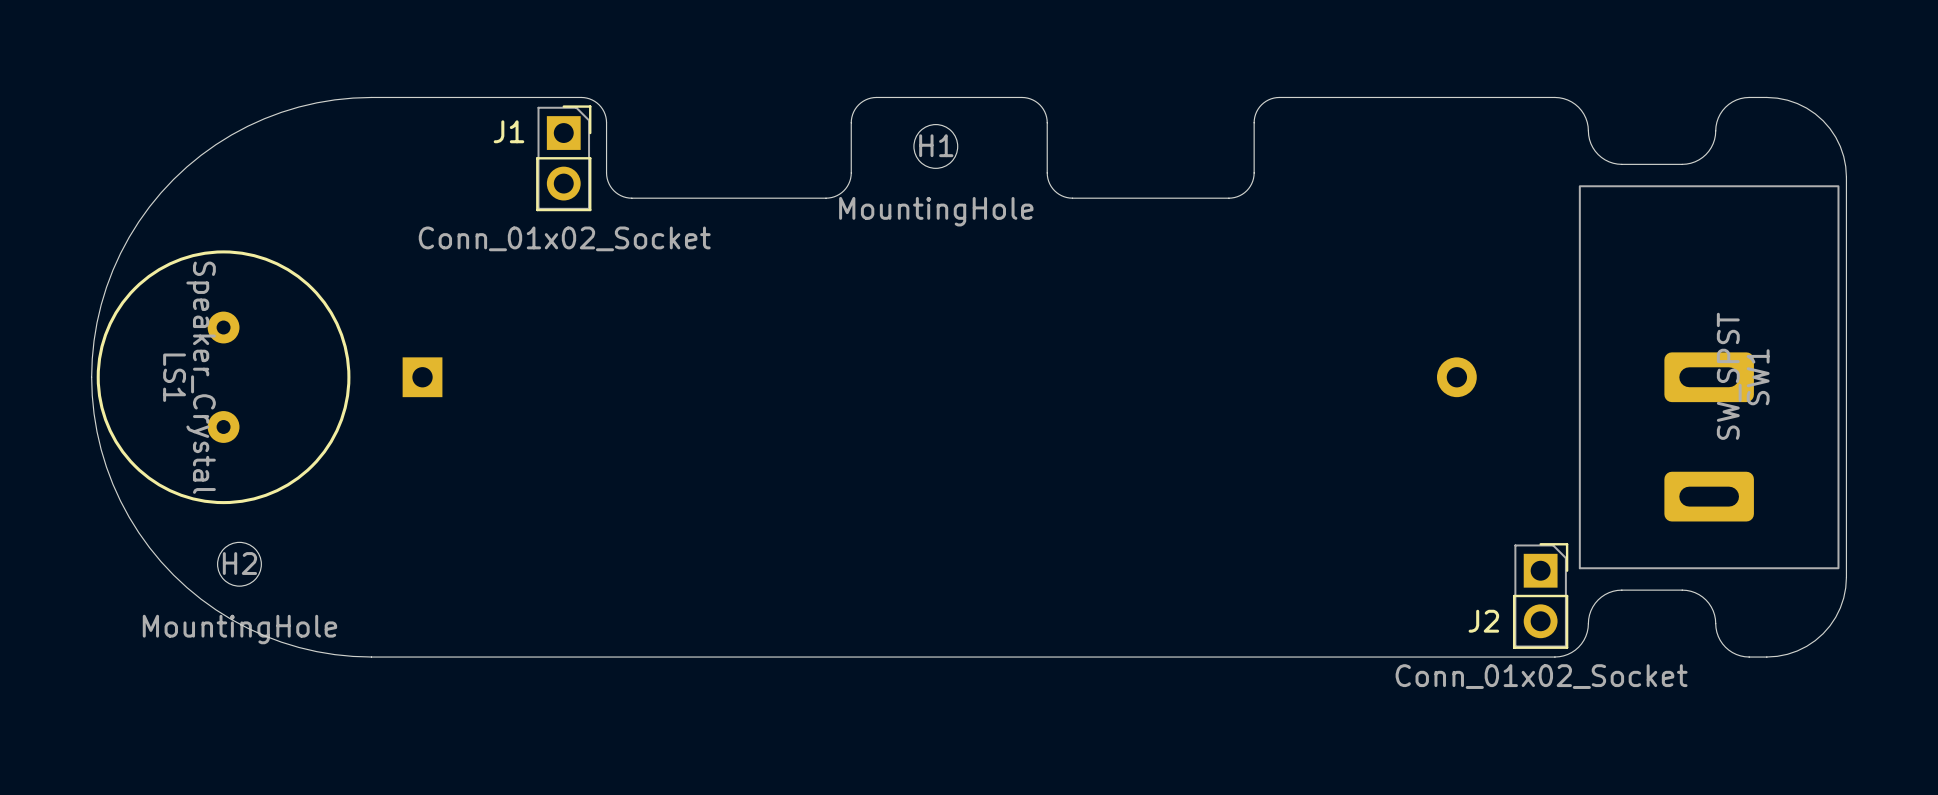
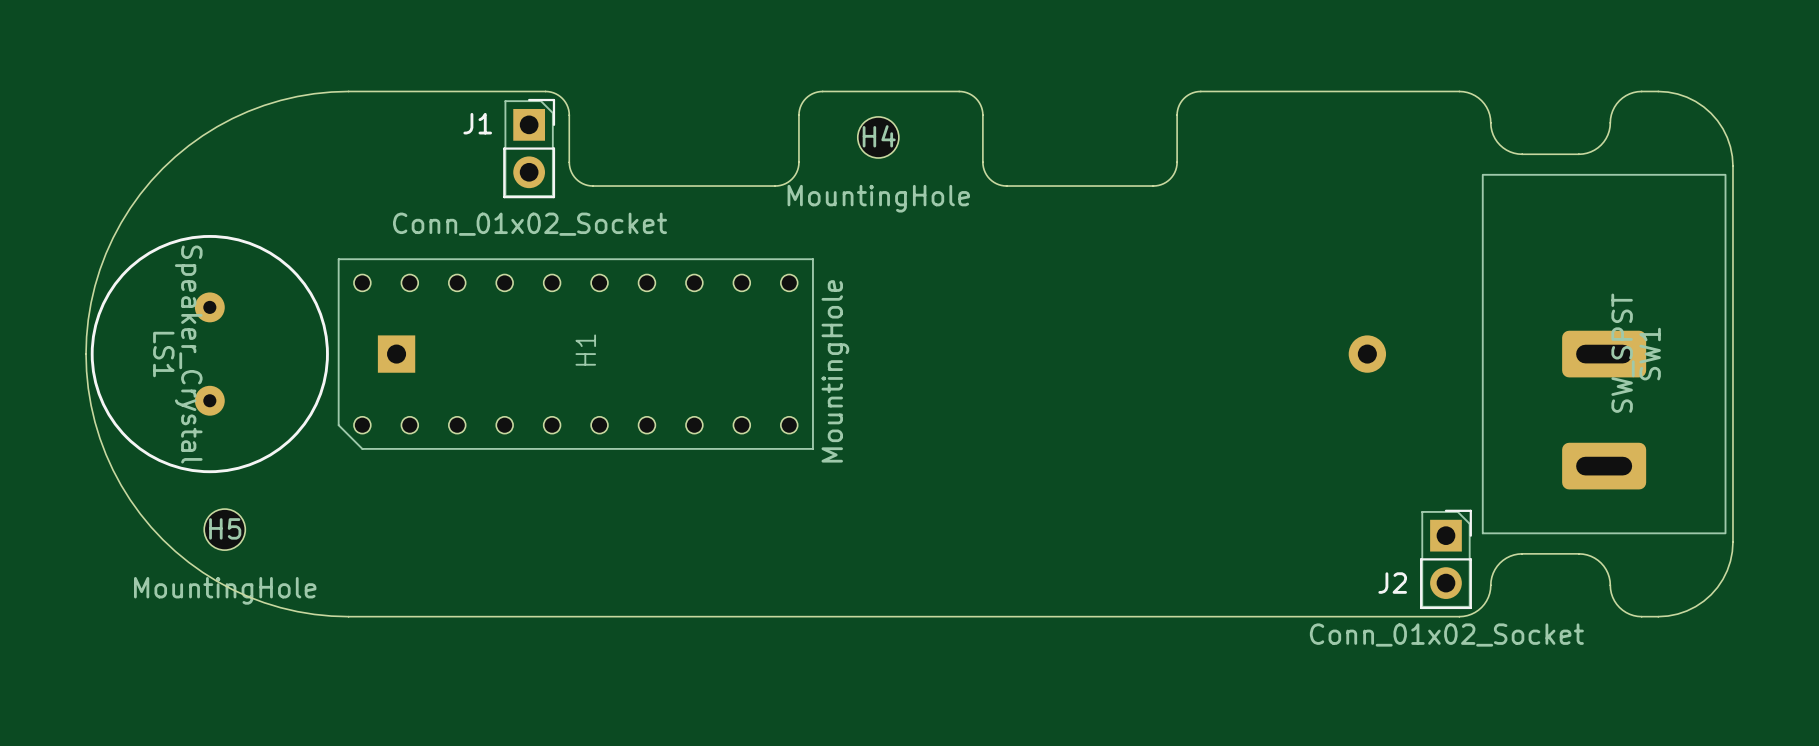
H1 name: H1 (936, 145) -> H4 (879, 136)
H1: none -> MountingHole (575, 354)
H2 name: H2 (239, 563) -> H5 (225, 528)

